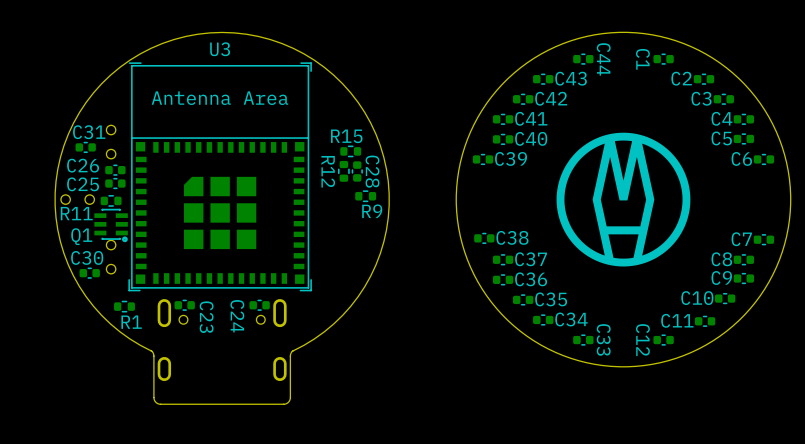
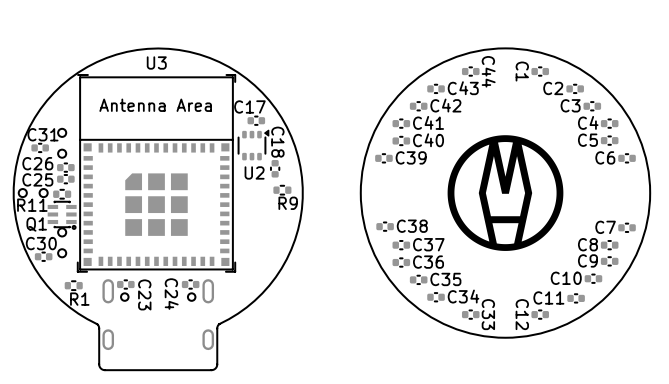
C17: none -> (256, 120)
U2: none -> (253, 145)
R15: (350, 151) -> none
R12: (343, 171) -> none
C28 name: C28 (372, 171) -> C18 (277, 142)

